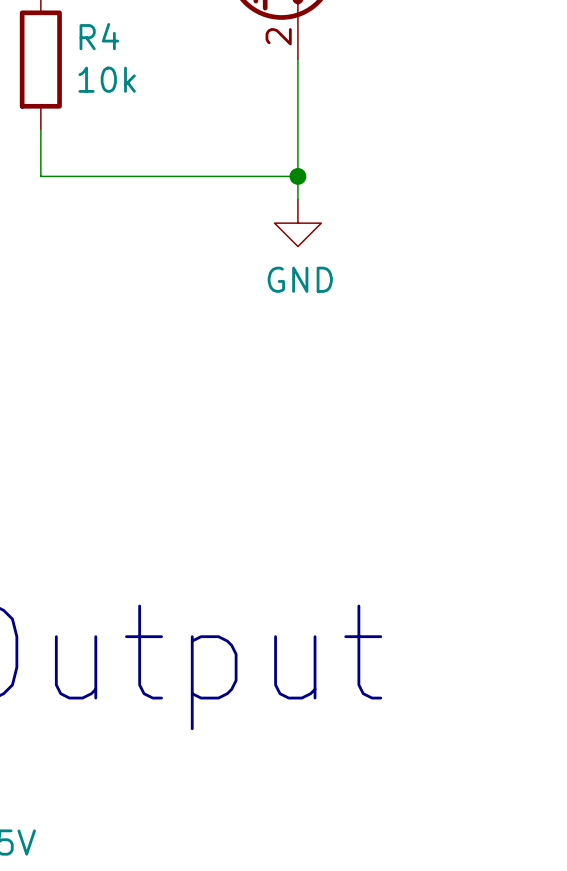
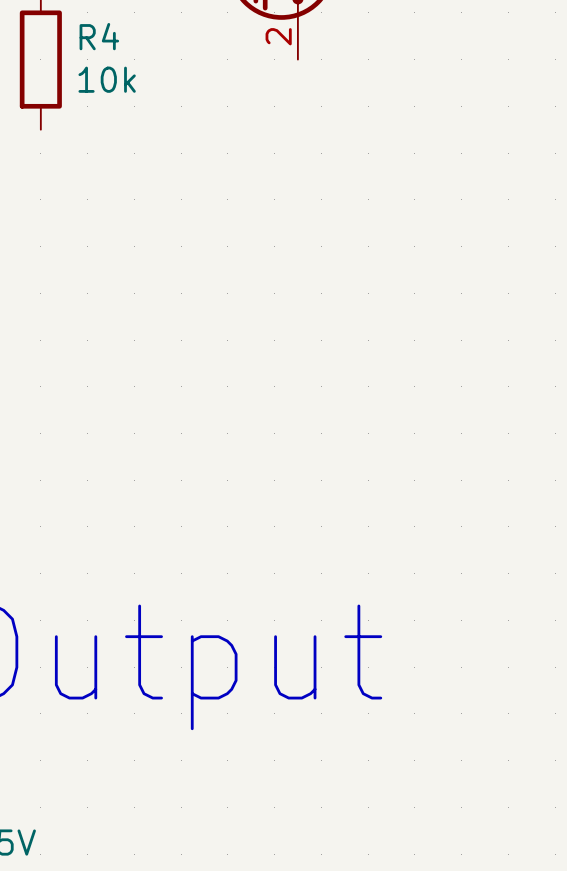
wire: (297, 59) (297, 199) -> none
wire: (40, 129) (40, 176) (297, 176) -> none
junction: (297, 176) -> none
power symbol: GND (297, 223) -> none

